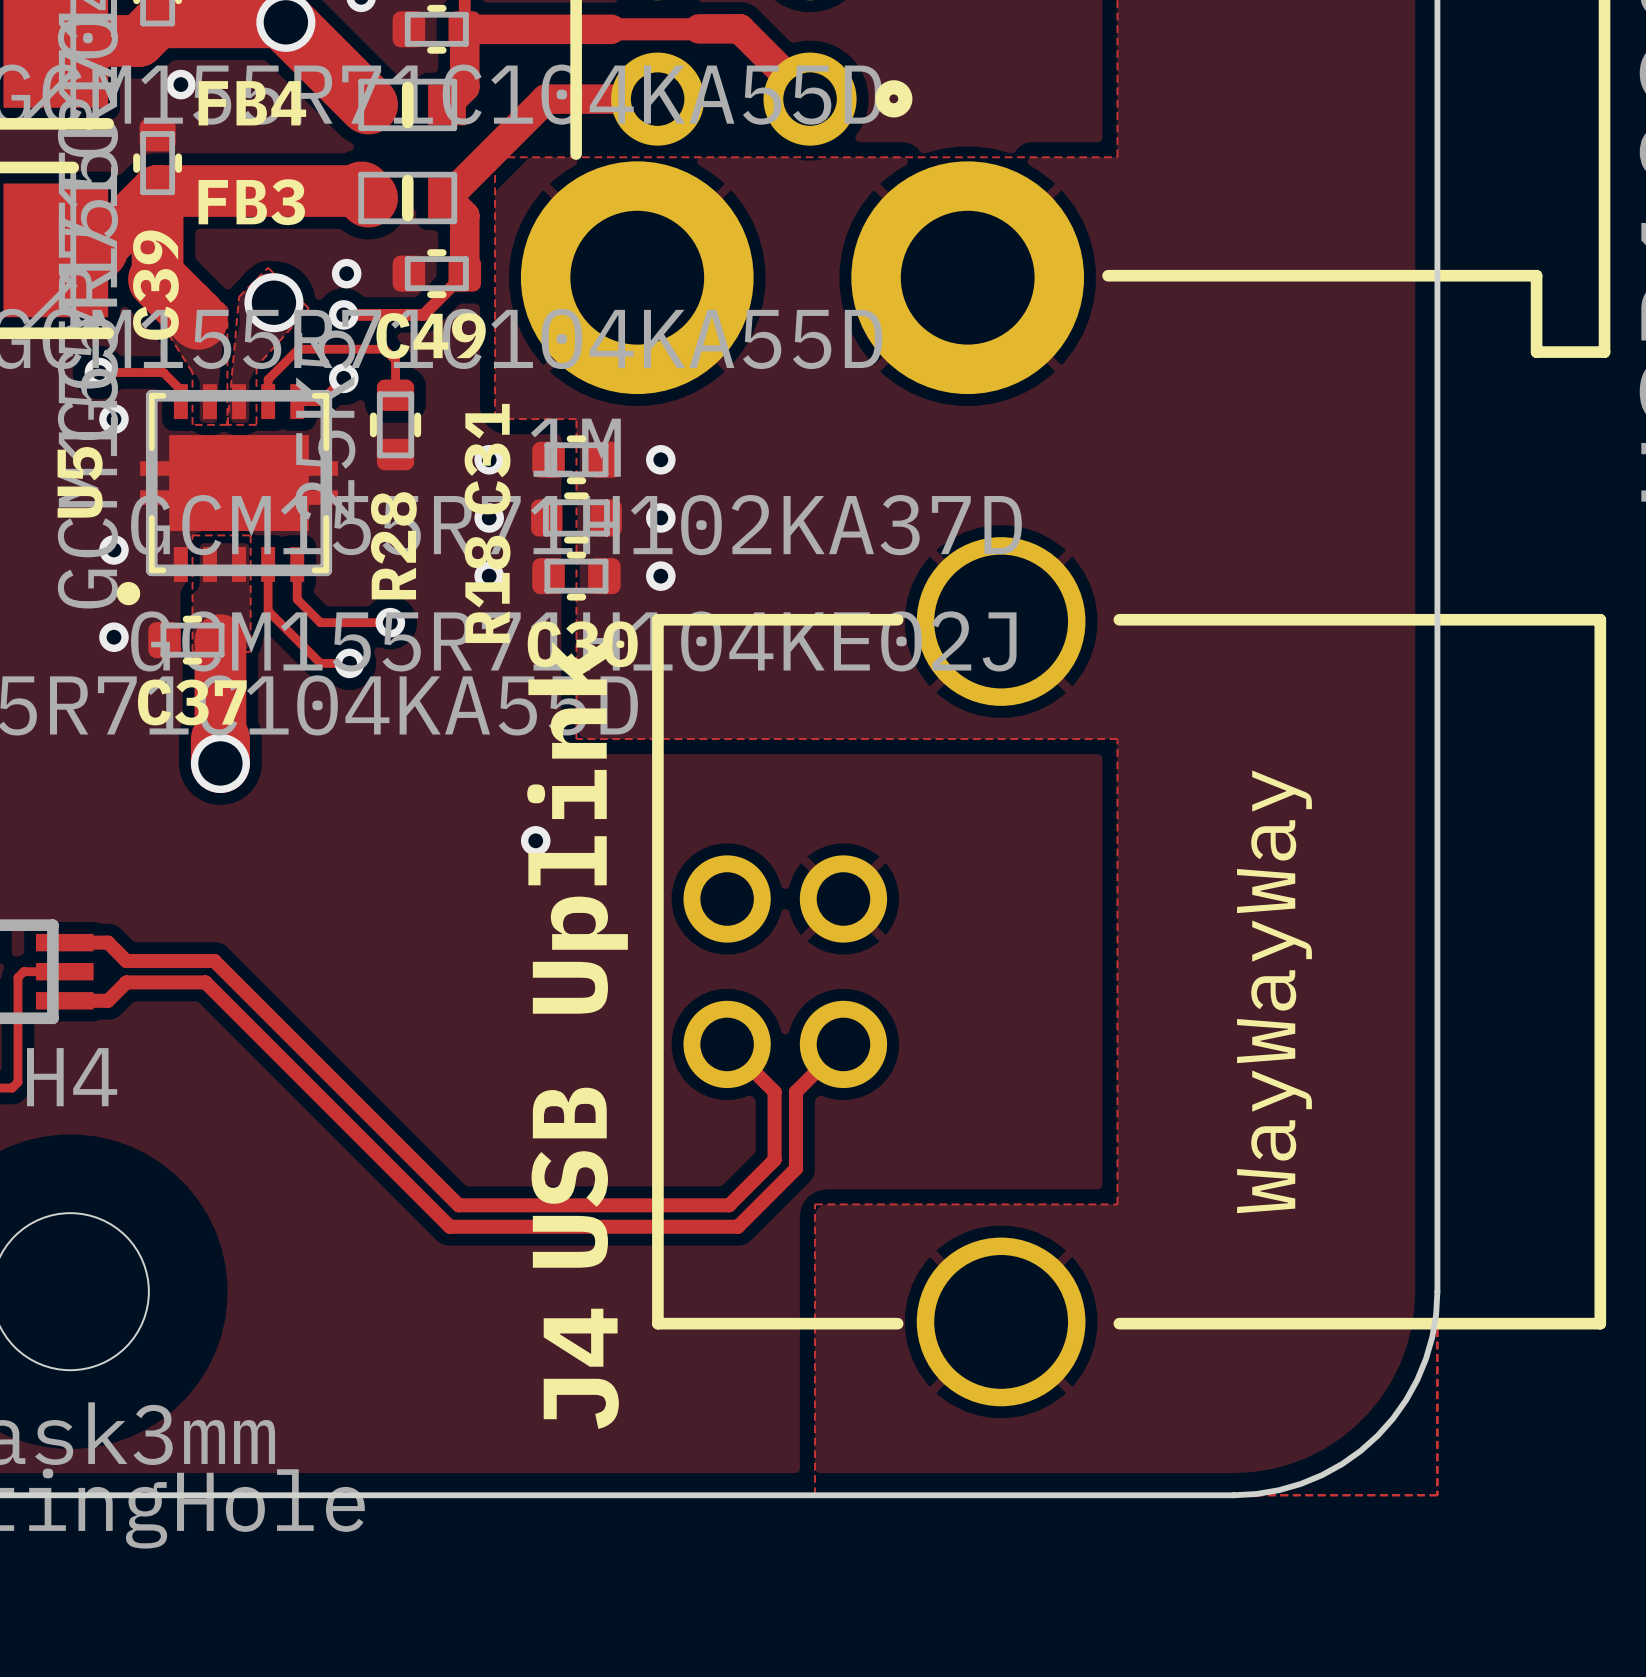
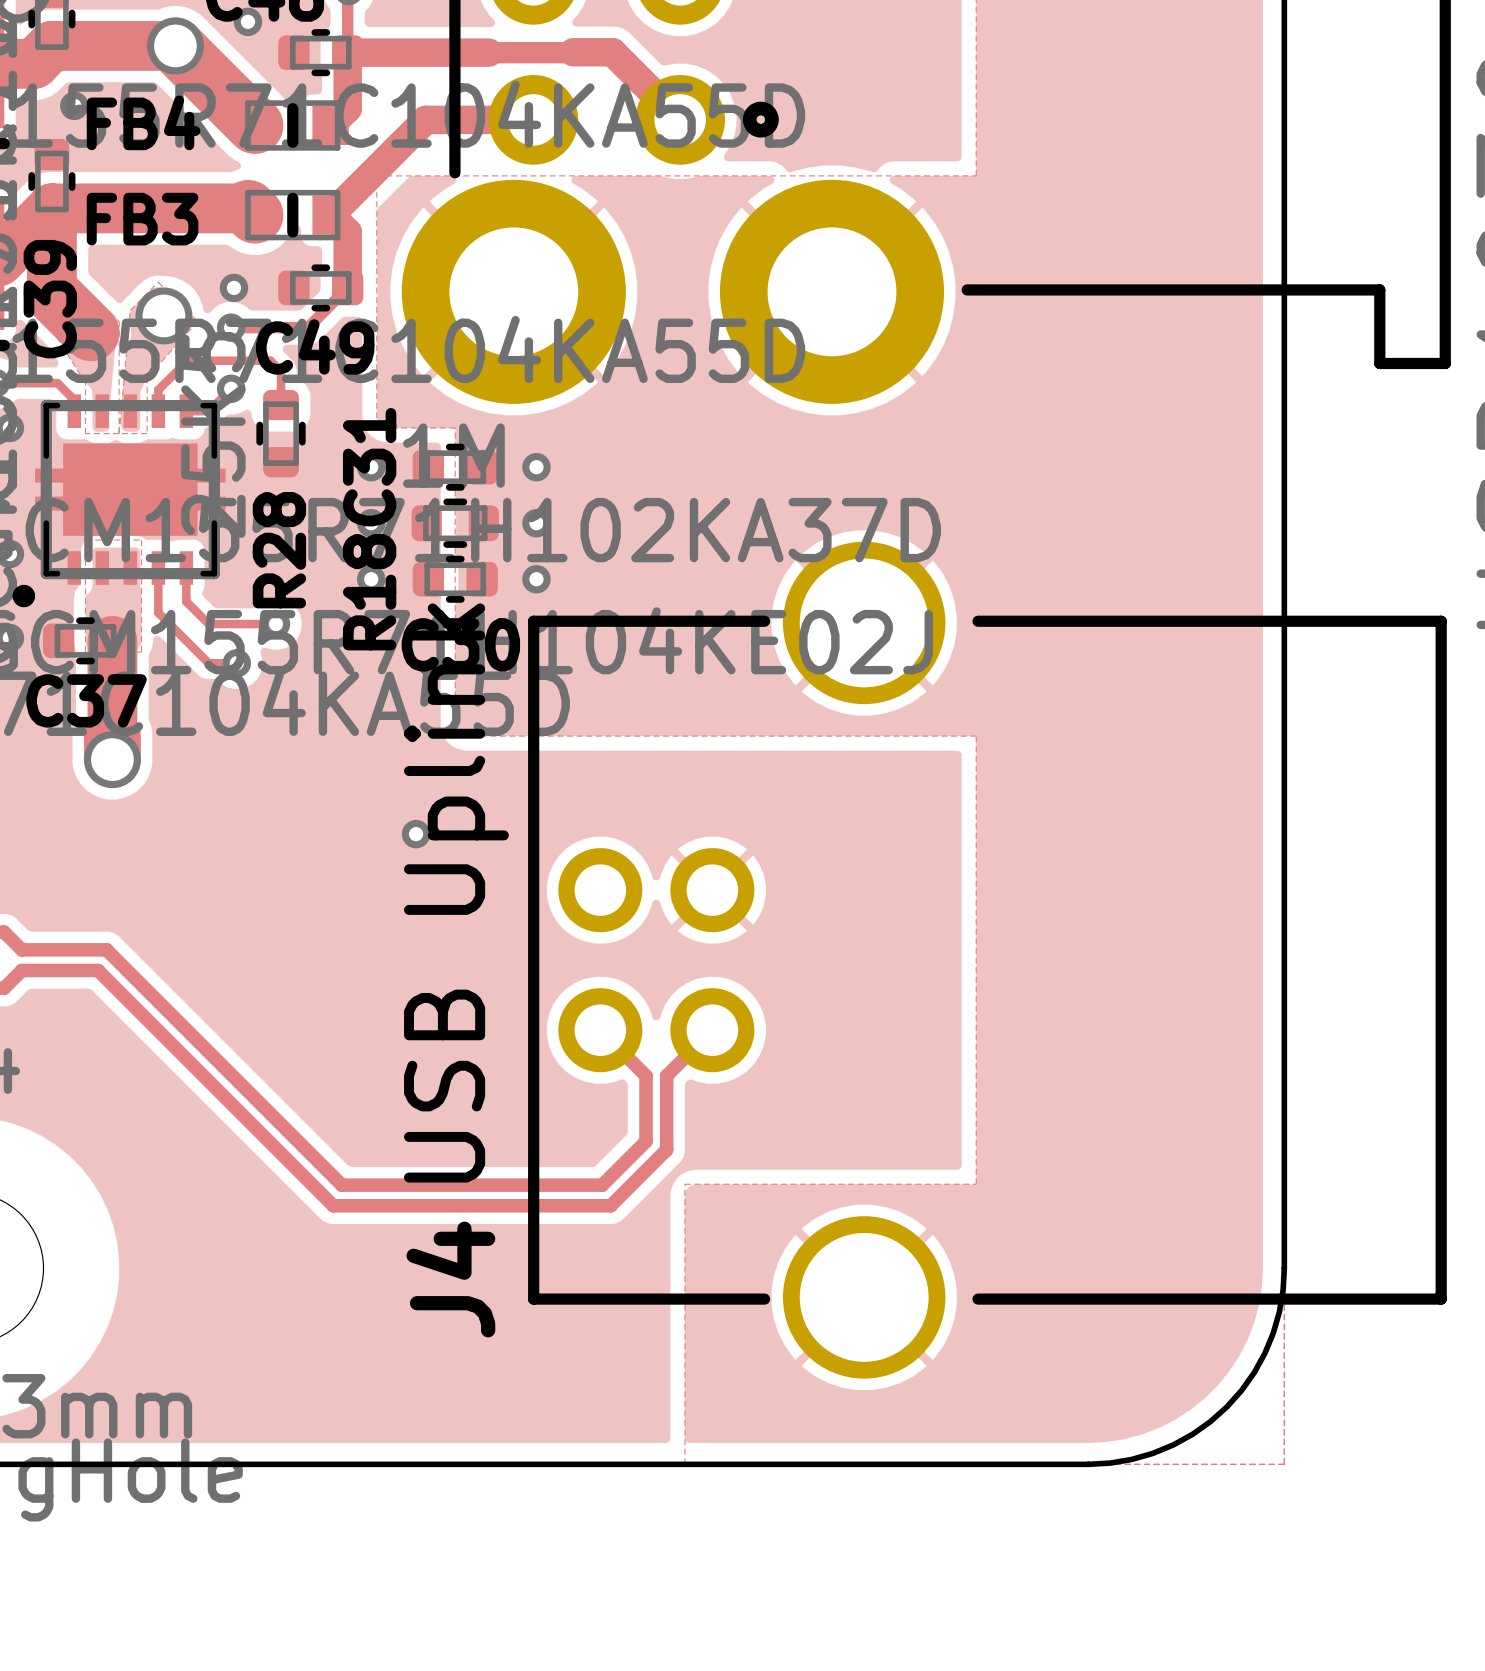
text position: USB Uplink (577, 953) -> USB Uplink (456, 892)
text: WayWayWay (1274, 991) -> none
J4 name position: J4 (581, 1368) -> J4 (450, 1279)

